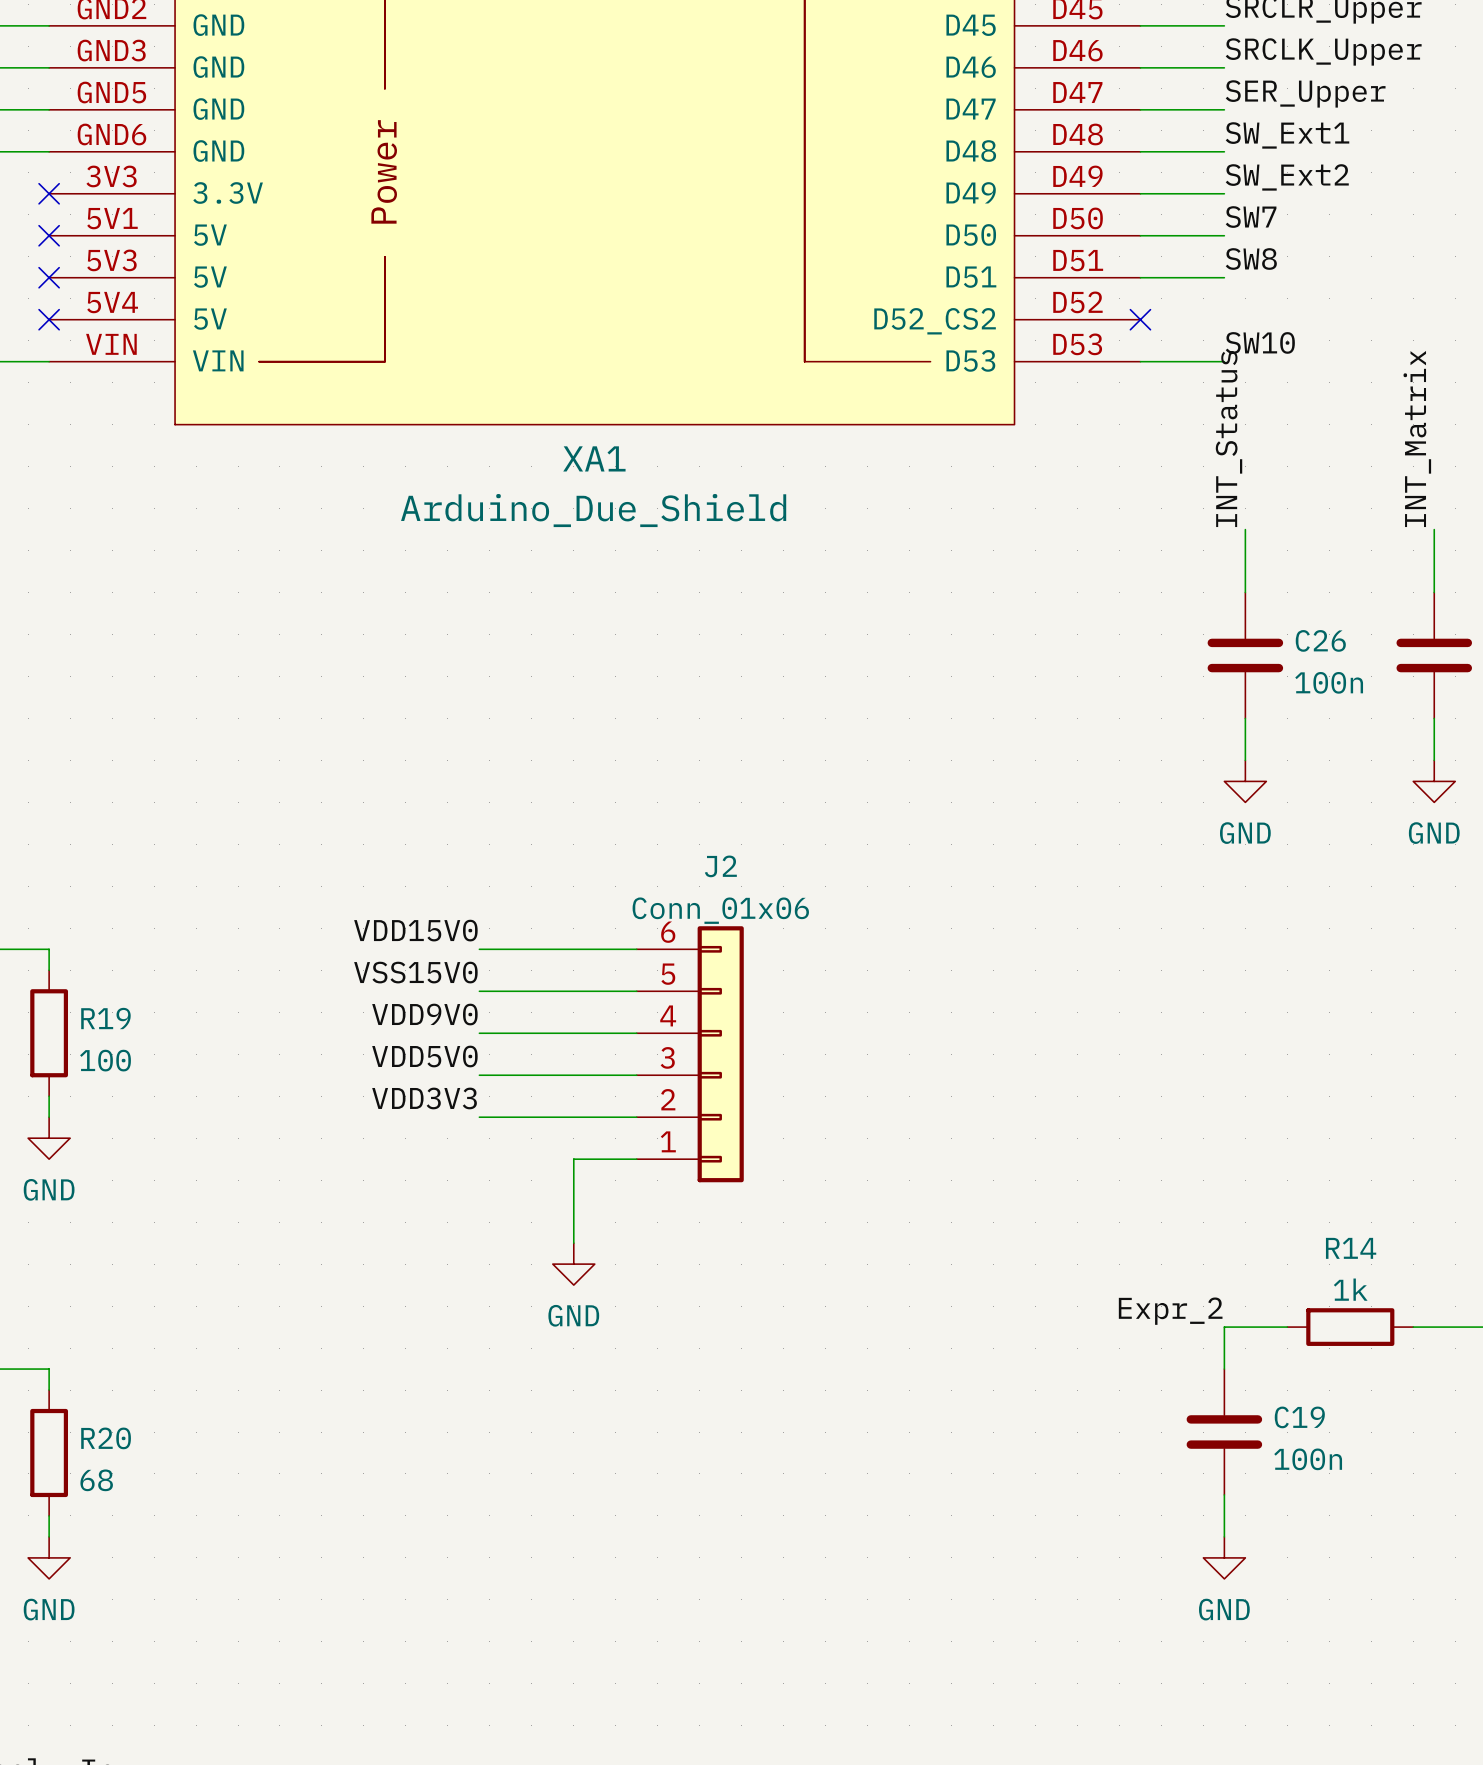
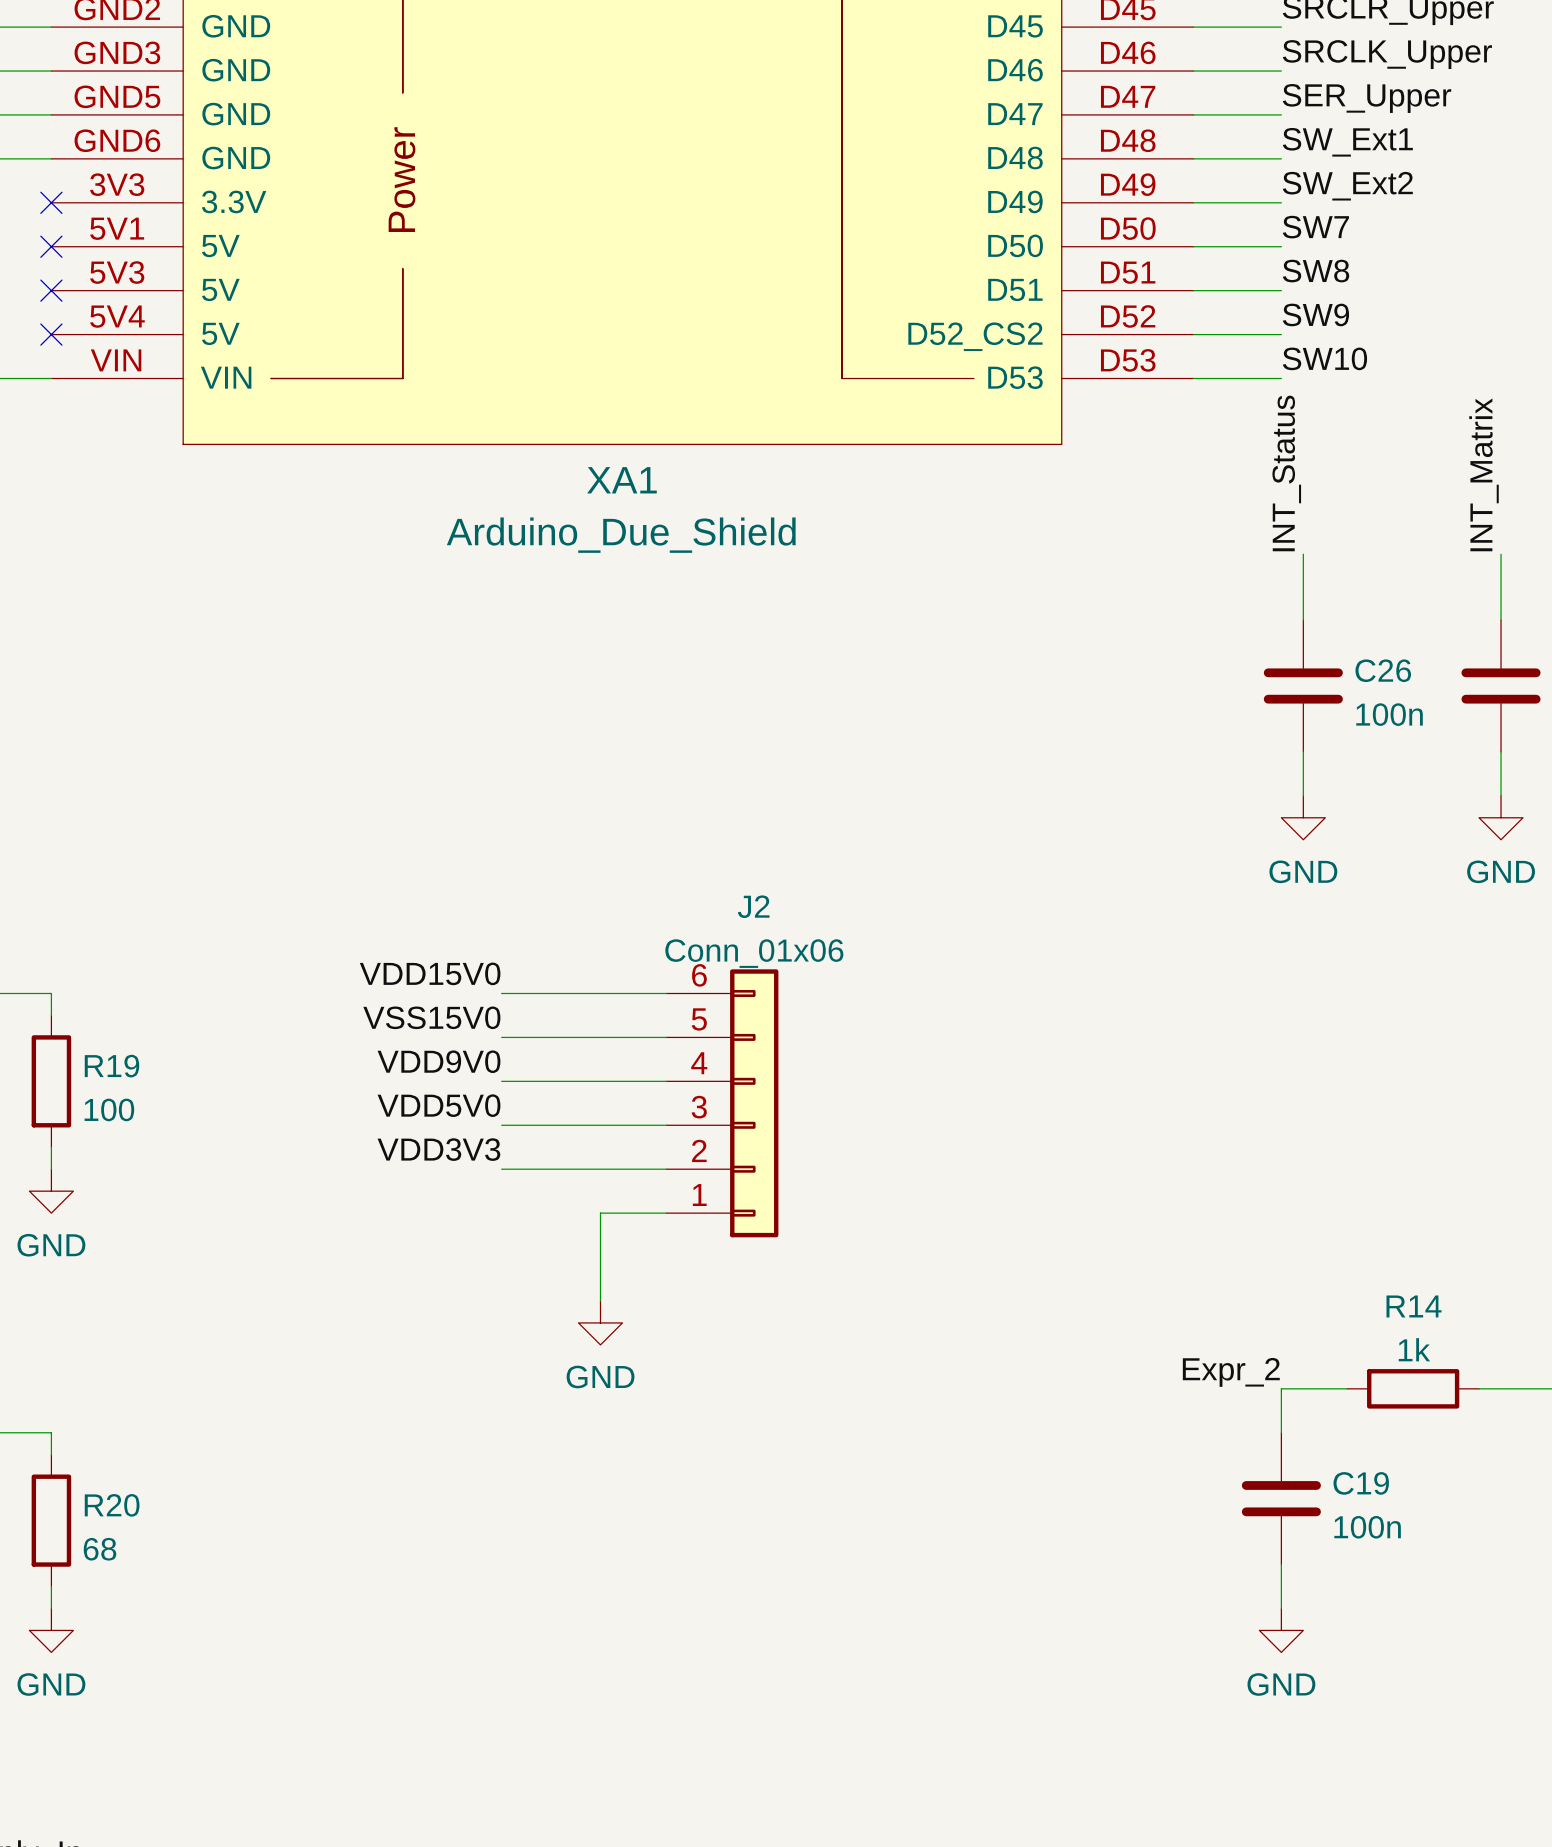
label: none -> SW9 (1315, 314)
wire: none -> (1193, 334) (1281, 334)
no-connect mark: (1140, 319) -> none

